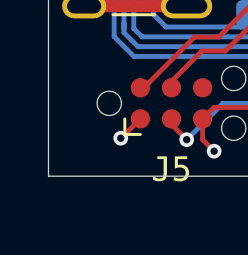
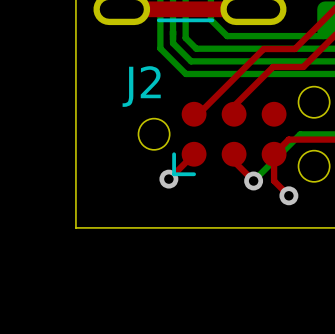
J5 name: J5 (171, 168) -> J2 (141, 86)

